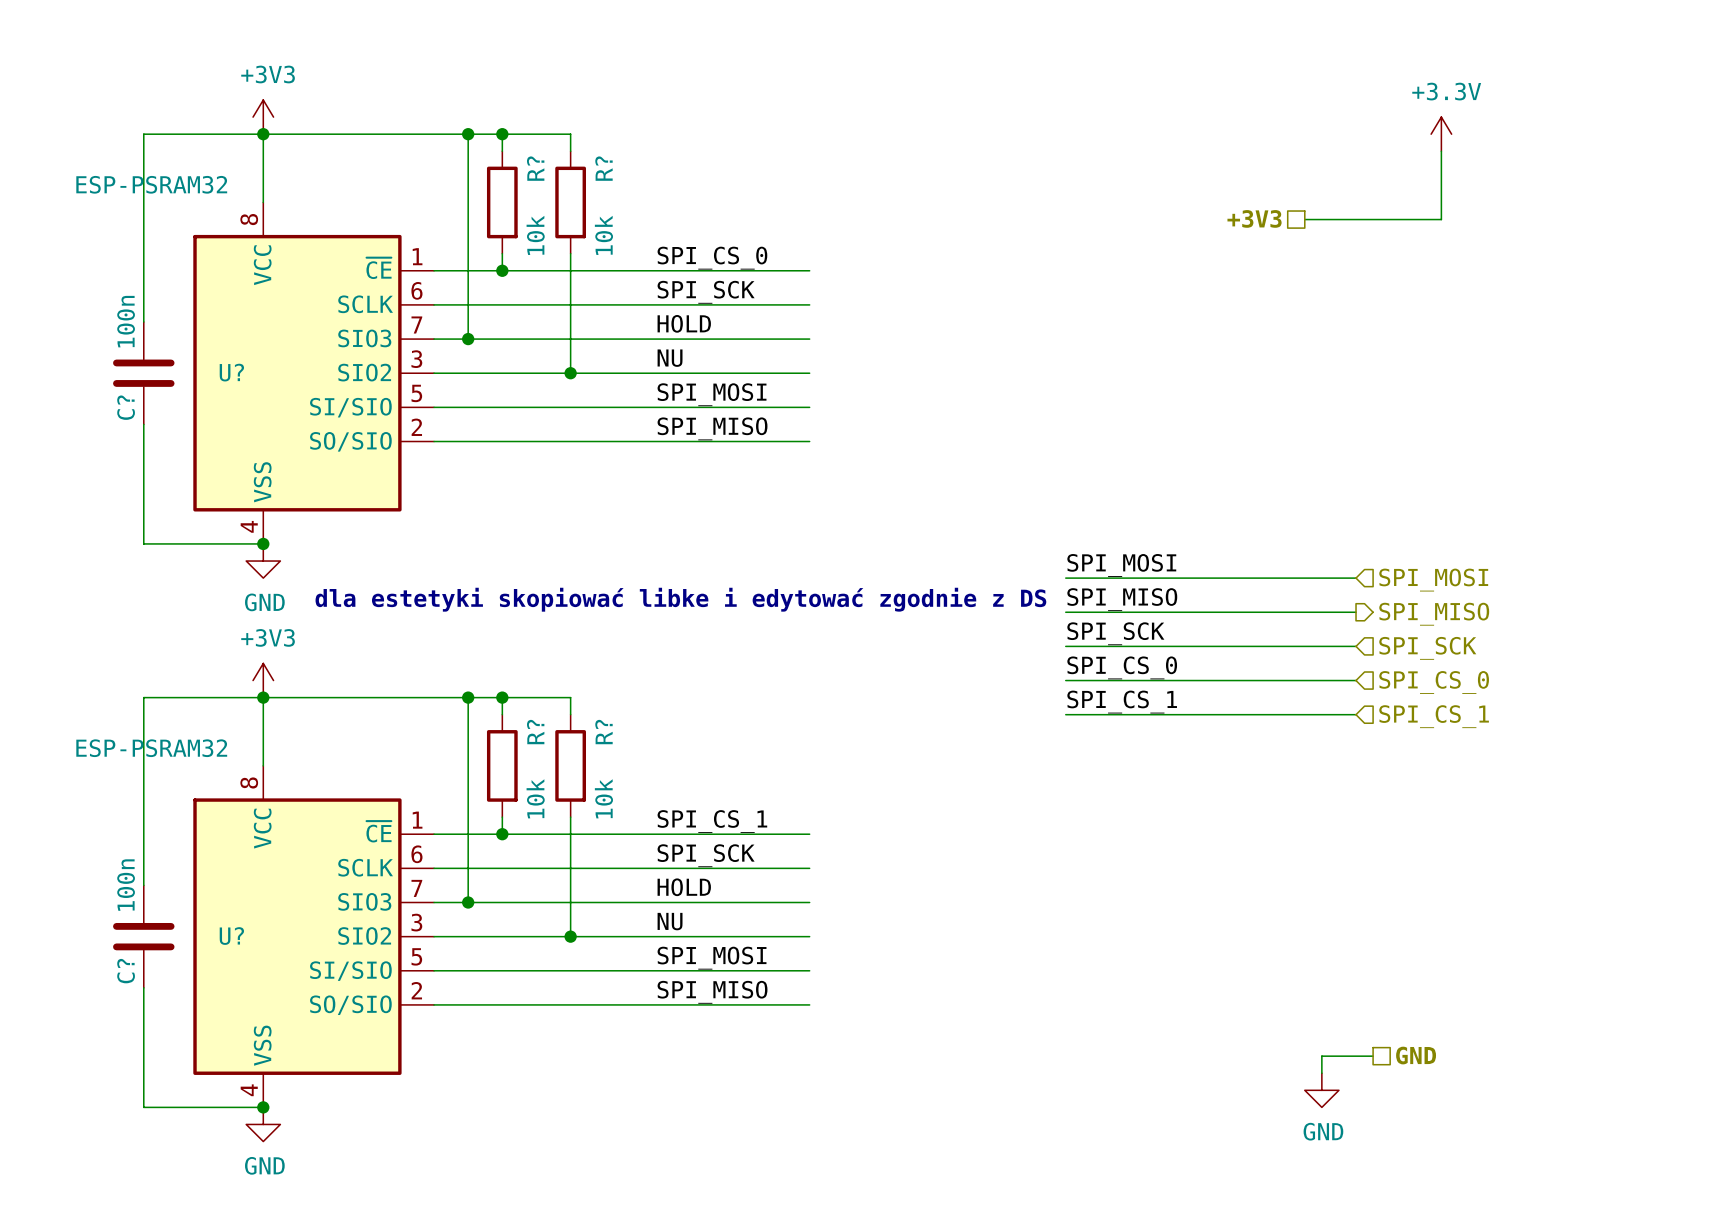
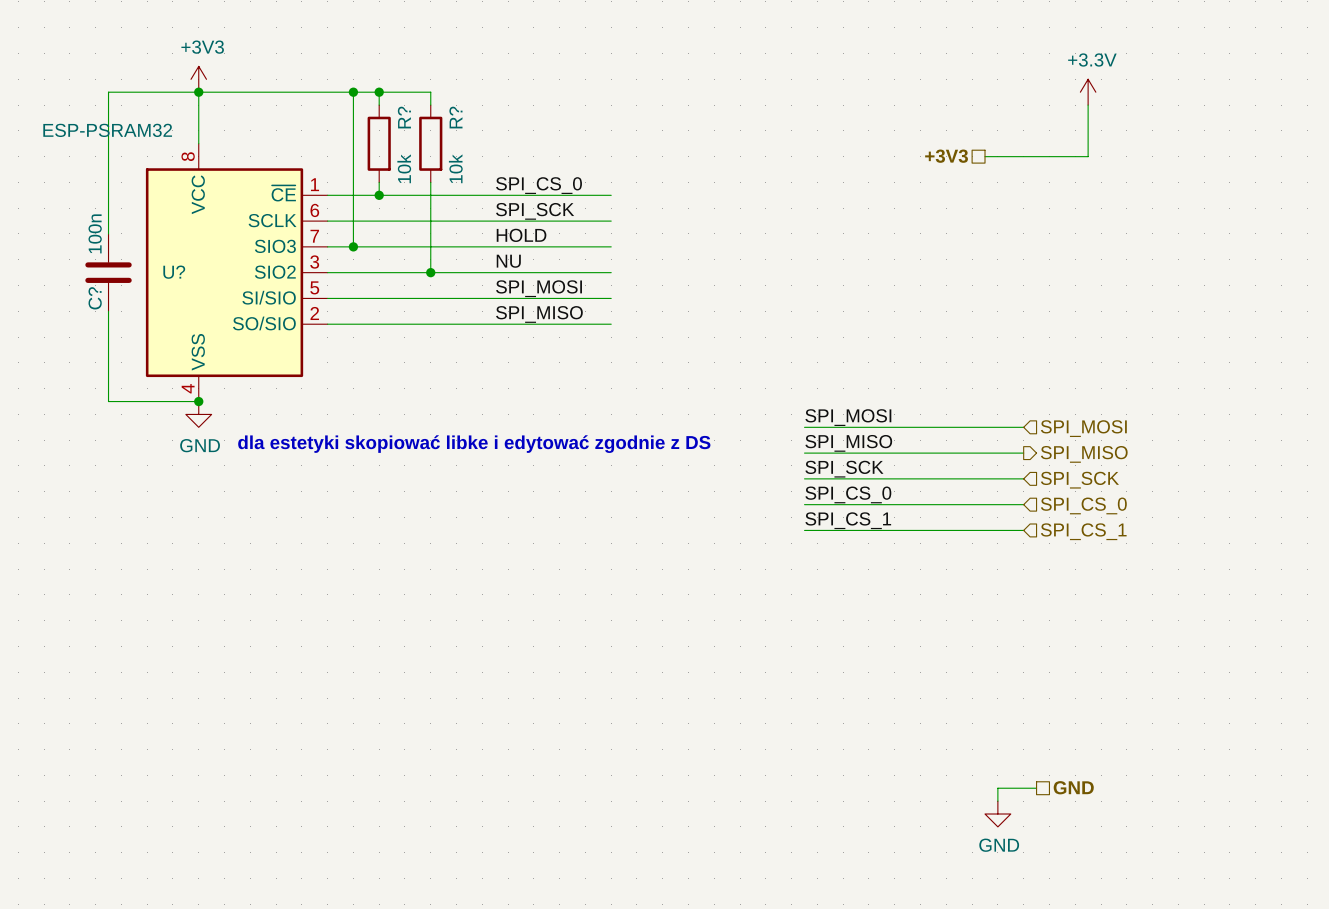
power symbol: +3V3 (263, 680) -> none
wire: (263, 697) (263, 765) -> none
junction: (263, 697) -> none
wire: (468, 697) (468, 902) -> none
junction: (468, 697) -> none
wire: (502, 697) (502, 714) -> none
junction: (502, 697) -> none
wire: (570, 714) (570, 697) (143, 697) (143, 885) -> none
R?: 10k (502, 765) -> none
R?: 10k (570, 765) -> none
wire: (502, 817) (502, 834) -> none
wire: (570, 817) (570, 936) -> none
label: SPI_CS_1 (712, 821) -> none
wire: (434, 834) (809, 834) -> none
junction: (502, 834) -> none
label: SPI_SCK (706, 855) -> none
wire: (434, 868) (809, 868) -> none
label: HOLD (684, 887) -> none
wire: (434, 902) (809, 902) -> none
junction: (468, 902) -> none
label: NU (670, 921) -> none
C?: 100n (143, 936) -> none
U?: ESP-PSRAM32 (313, 936) -> none
wire: (434, 936) (809, 936) -> none
junction: (570, 936) -> none
label: SPI_MOSI (712, 958) -> none
wire: (434, 970) (809, 970) -> none
wire: (143, 987) (143, 1107) (263, 1107) -> none
label: SPI_MISO (712, 992) -> none
wire: (434, 1004) (809, 1004) -> none
junction: (263, 1107) -> none
power symbol: GND (263, 1124) -> none

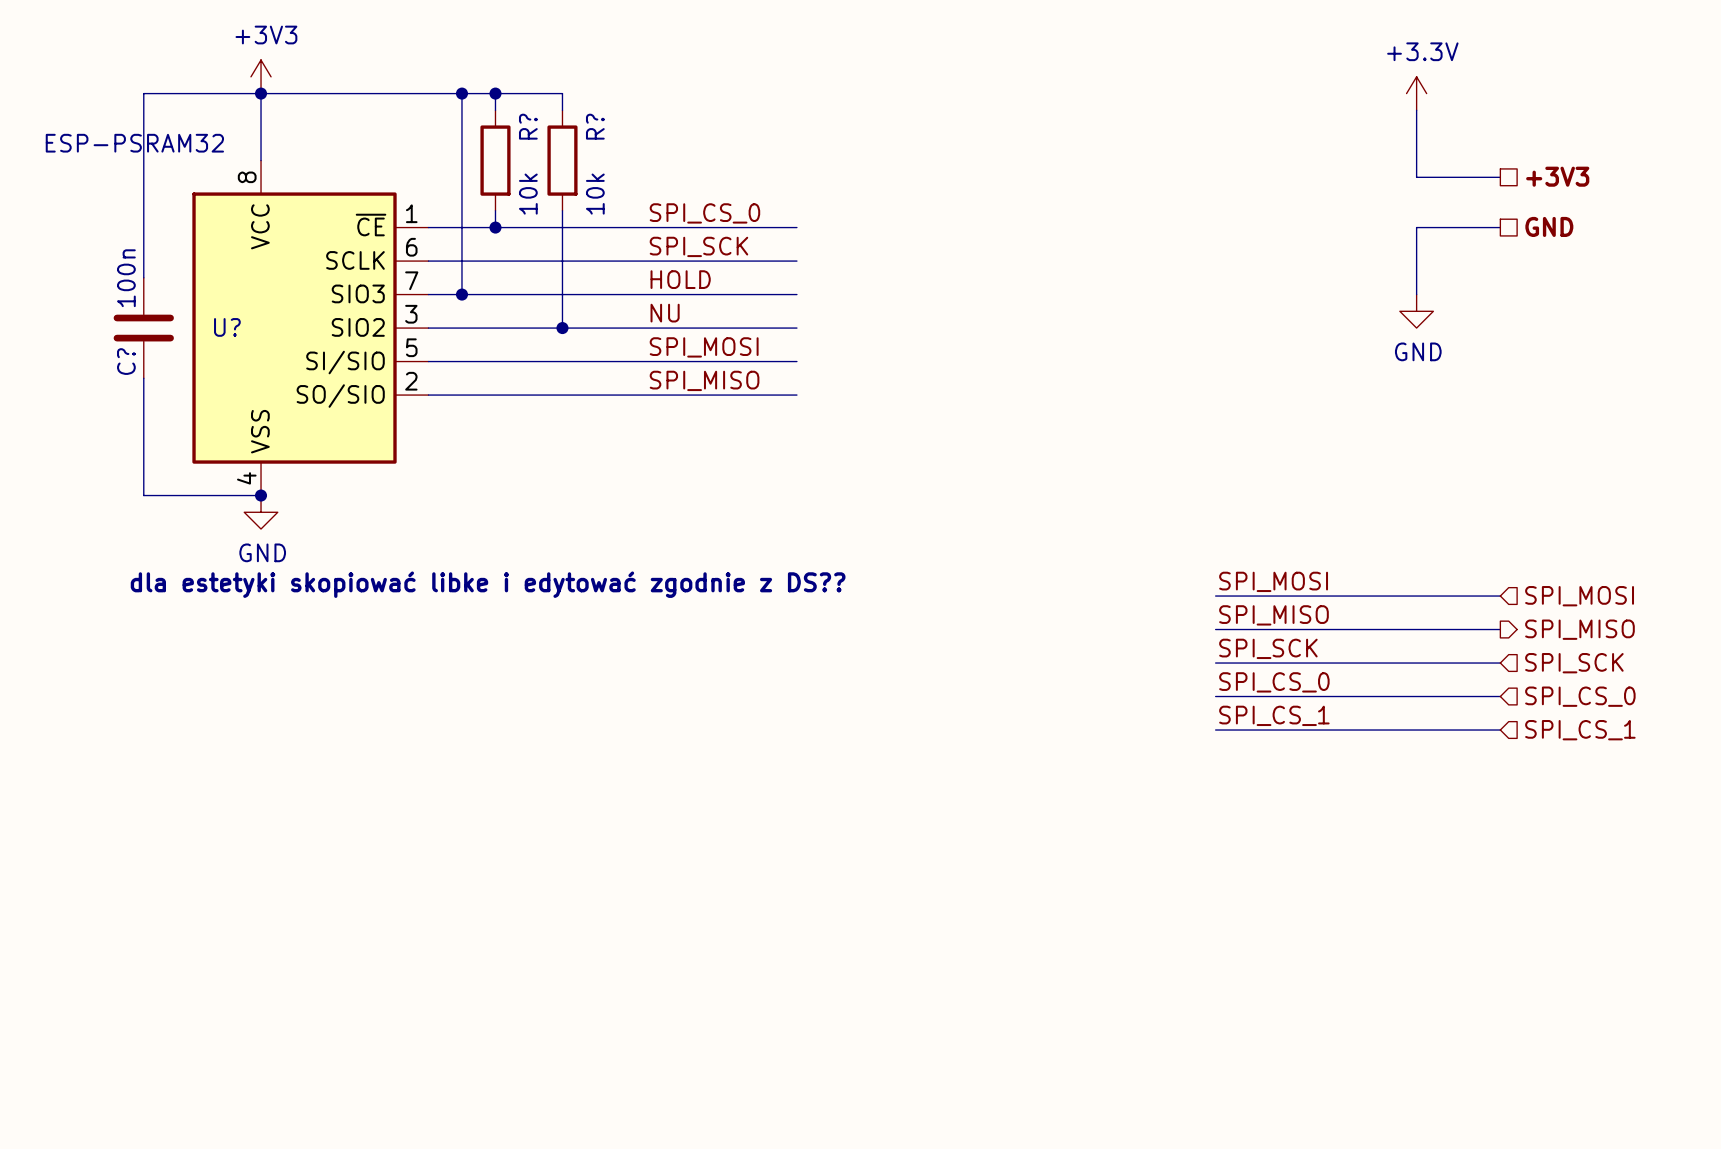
hierarchical label rotation: 0° (946, 156) -> 180° (1557, 176)
hierarchical label position: +3V3 (946, 156) -> +3V3 (1557, 176)
wire: (985, 156) (1088, 156) -> (1500, 177) (1416, 177)
hierarchical label: none -> GND (1549, 226)
wire: none -> (1500, 227) (1416, 227) (1416, 294)
power symbol: none -> GND (1416, 311)
label position: SPI_MOSI (848, 417) -> SPI_MOSI (1273, 581)
wire: (804, 427) (1023, 427) -> (1215, 696) (1500, 696)
hierarchical label position: SPI_MOSI (1083, 428) -> SPI_MOSI (1579, 596)
label position: SPI_MISO (848, 443) -> SPI_MISO (1273, 615)
text: dla estetyki skopiować libke i edytować zgodnie z DS (474, 444) -> dla estetyki skopiować libke i edytować zgodnie z DS?? (488, 584)
wire: (804, 453) (1023, 453) -> (1215, 730) (1500, 730)
hierarchical label position: SPI_MISO (1084, 454) -> SPI_MISO (1579, 629)
label position: SPI_SCK (844, 469) -> SPI_SCK (1268, 648)
wire: (804, 478) (933, 478) -> (1332, 596) (1500, 596)
hierarchical label position: SPI_SCK (1079, 480) -> SPI_SCK (1574, 663)
label position: SPI_CS_0 (848, 494) -> SPI_CS_0 (1274, 682)
wire: (804, 504) (933, 504) -> (1332, 629) (1500, 629)
hierarchical label position: SPI_CS_0 (1083, 505) -> SPI_CS_0 (1580, 696)
label position: SPI_CS_1 (848, 520) -> SPI_CS_1 (1274, 715)
wire: (804, 530) (933, 530) -> (1332, 663) (1500, 663)
hierarchical label position: SPI_CS_1 (1083, 531) -> SPI_CS_1 (1580, 730)
hierarchical label: GND (1073, 787) -> none
wire: (1036, 788) (997, 788) (997, 801) -> none
power symbol: GND (997, 814) -> none

